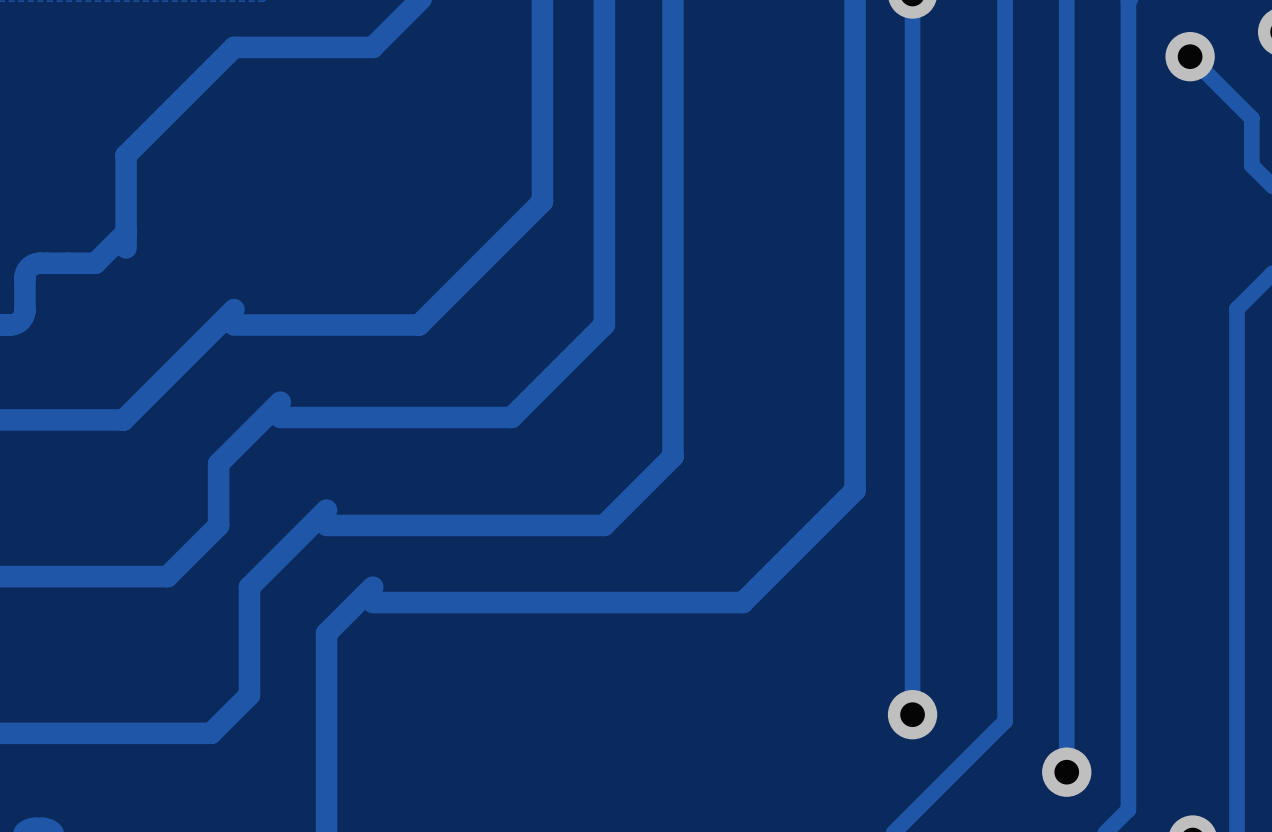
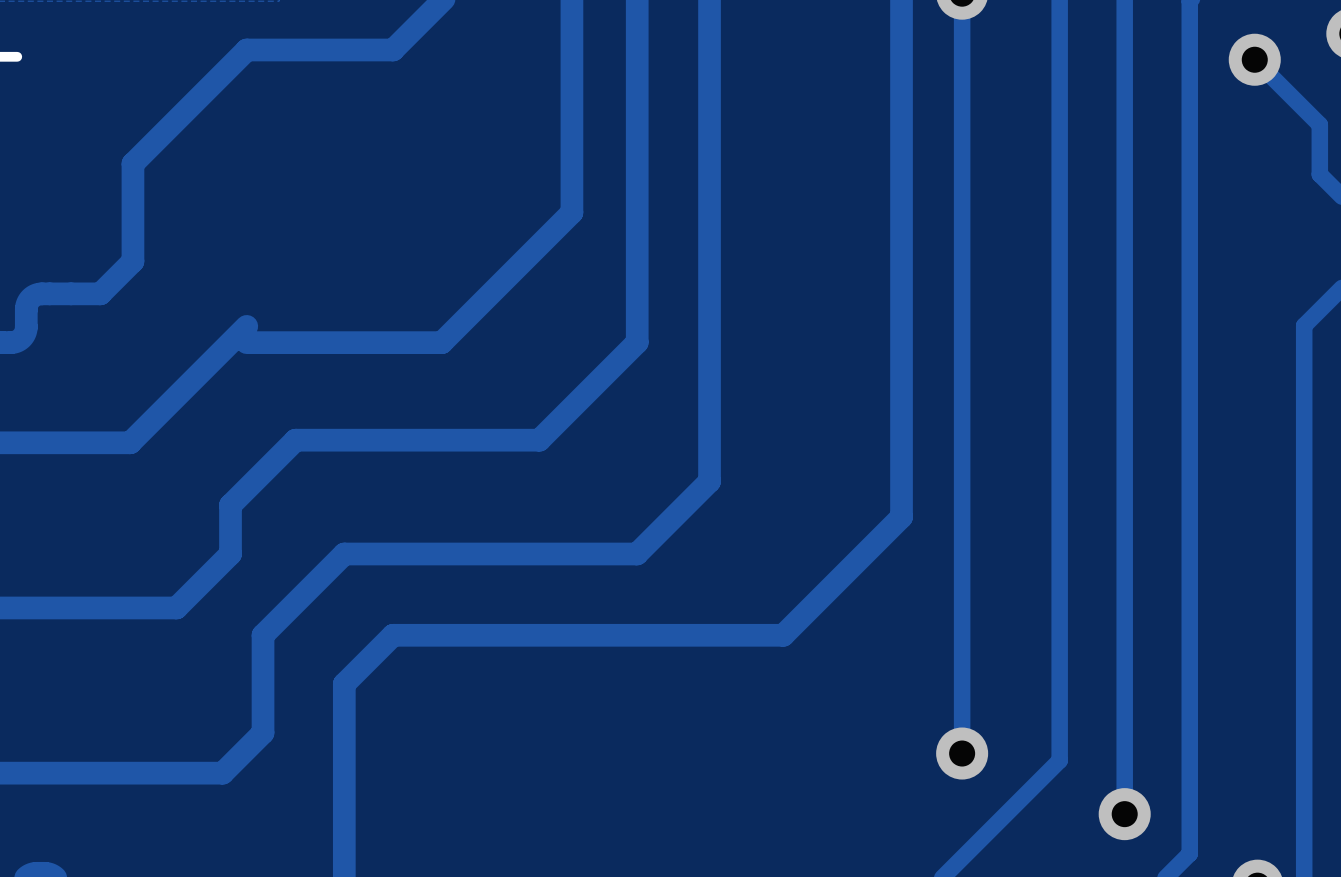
track: (126, 232) (95, 263) (39, 263) (31, 265) (25, 274) (24, 293) -> (132, 261) (100, 293) (38, 294) (29, 299) (26, 309)
track: (280, 402) (218, 463) (218, 479) -> (295, 440) (230, 505)
track: (326, 510) (249, 587) (249, 602) -> (344, 554) (263, 635)
track: (372, 587) (326, 633) (326, 648) -> (393, 635) (344, 684)

